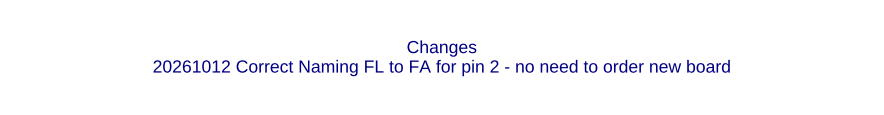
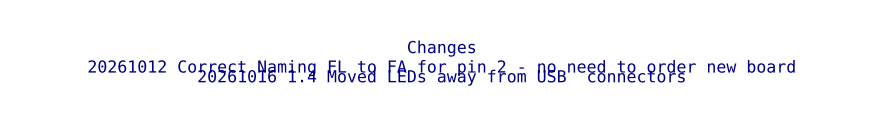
text: none -> 20261016 1.4 Moved LEDs away from USB connectors (441, 77)

